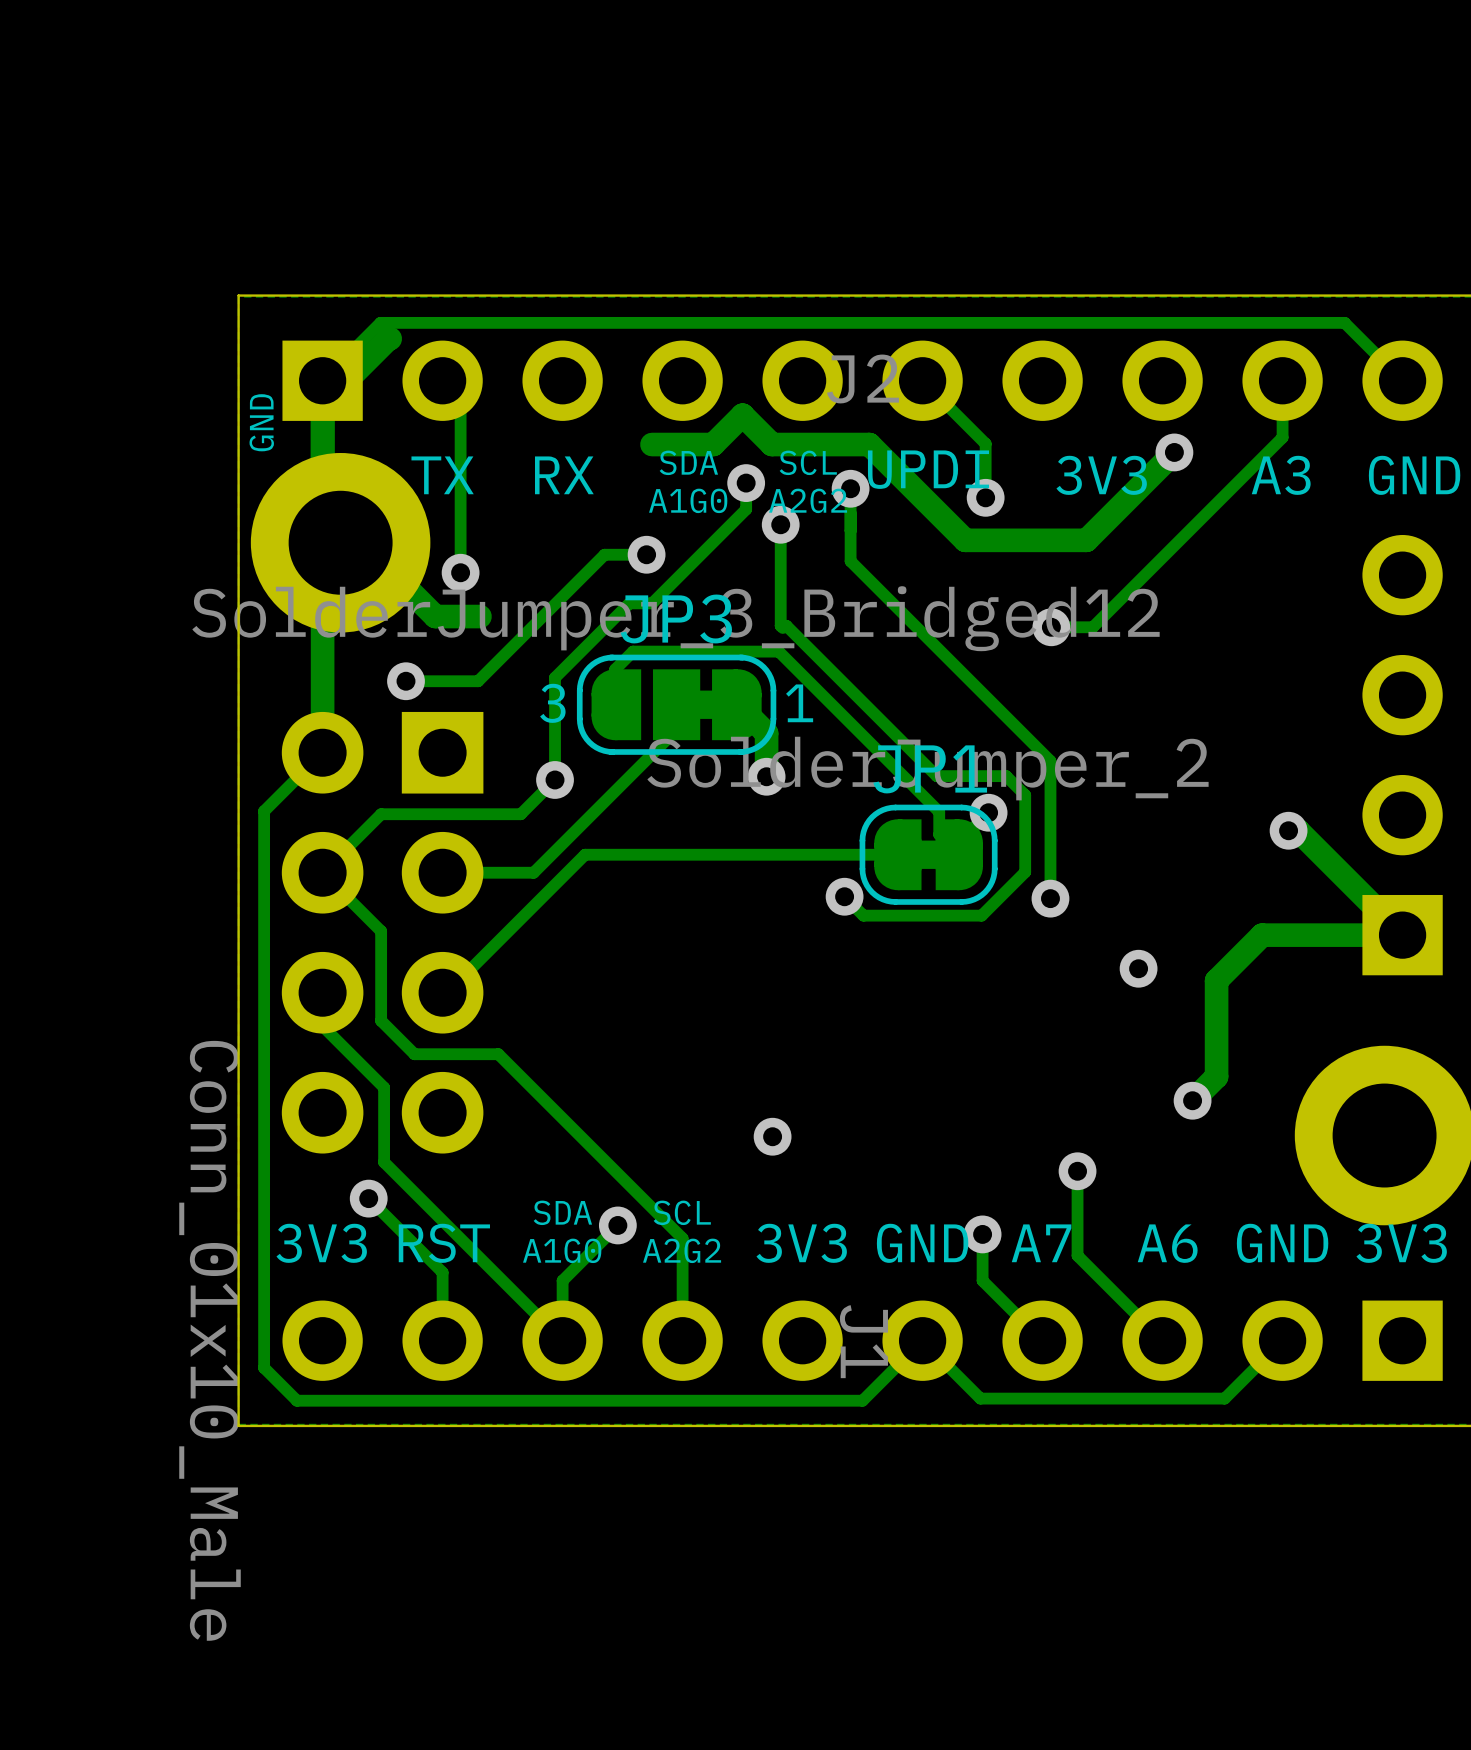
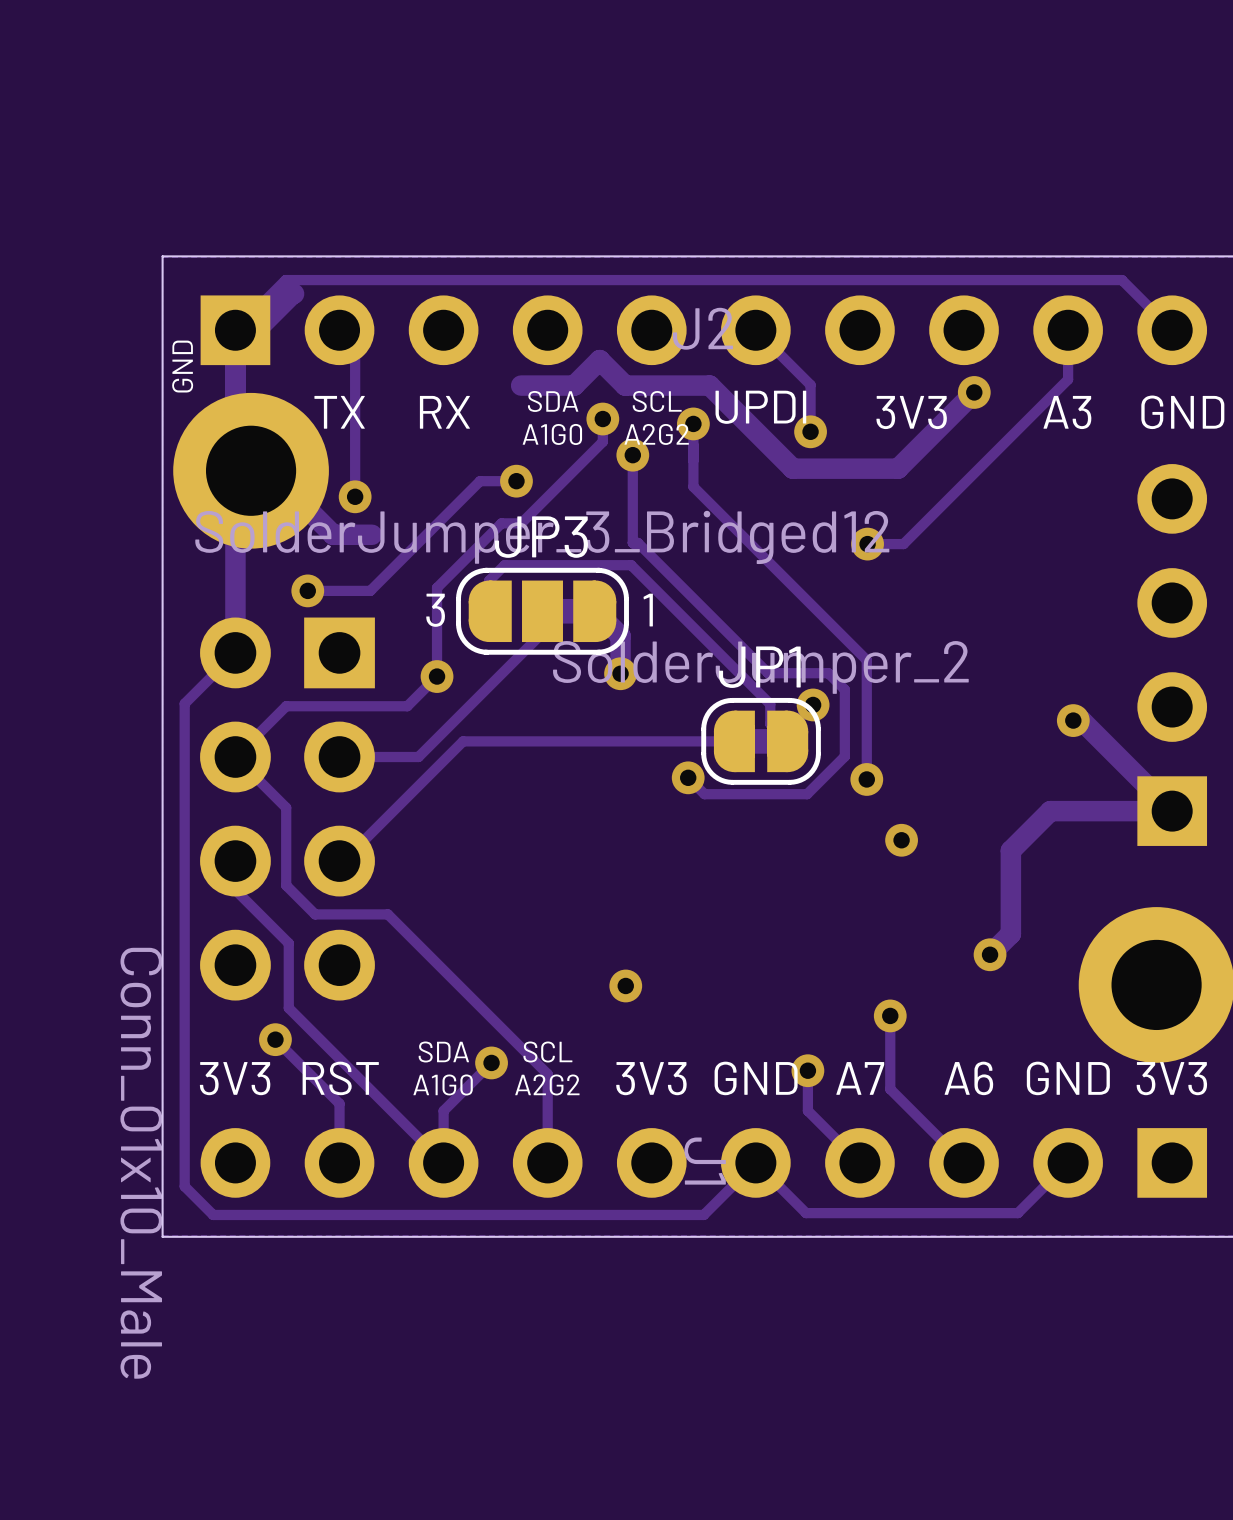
via position: (1138, 968) -> (901, 840)

